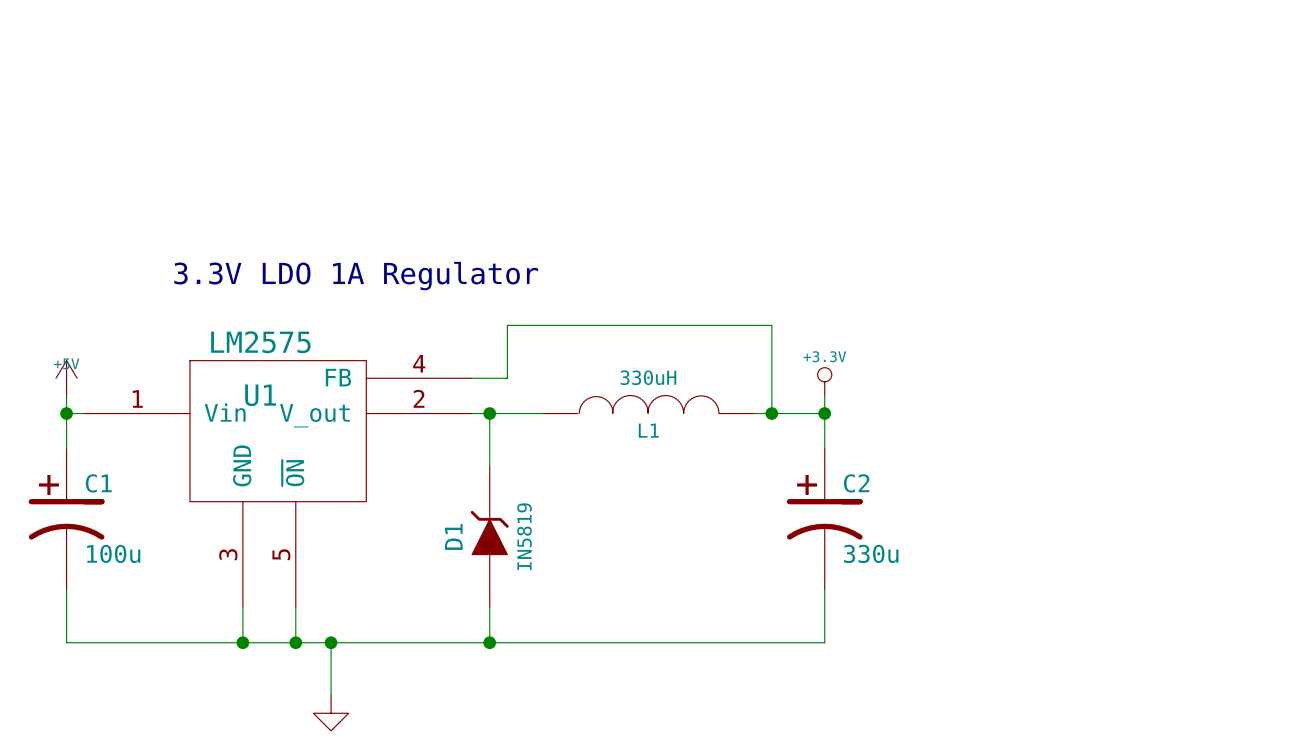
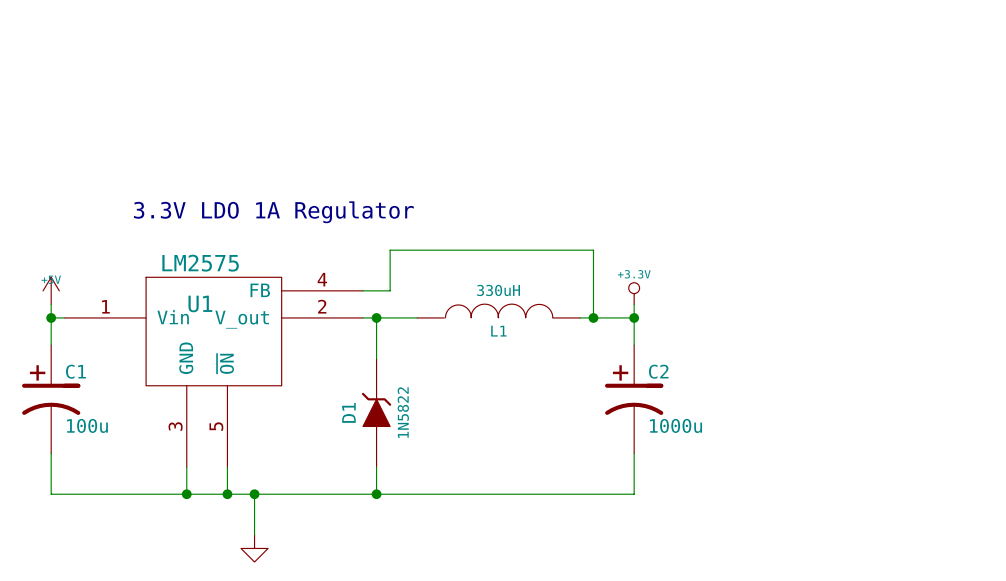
D1 value: IN5819 (524, 536) -> 1N5822 (403, 412)
C2 value: 330u (871, 553) -> 1000u (676, 425)

